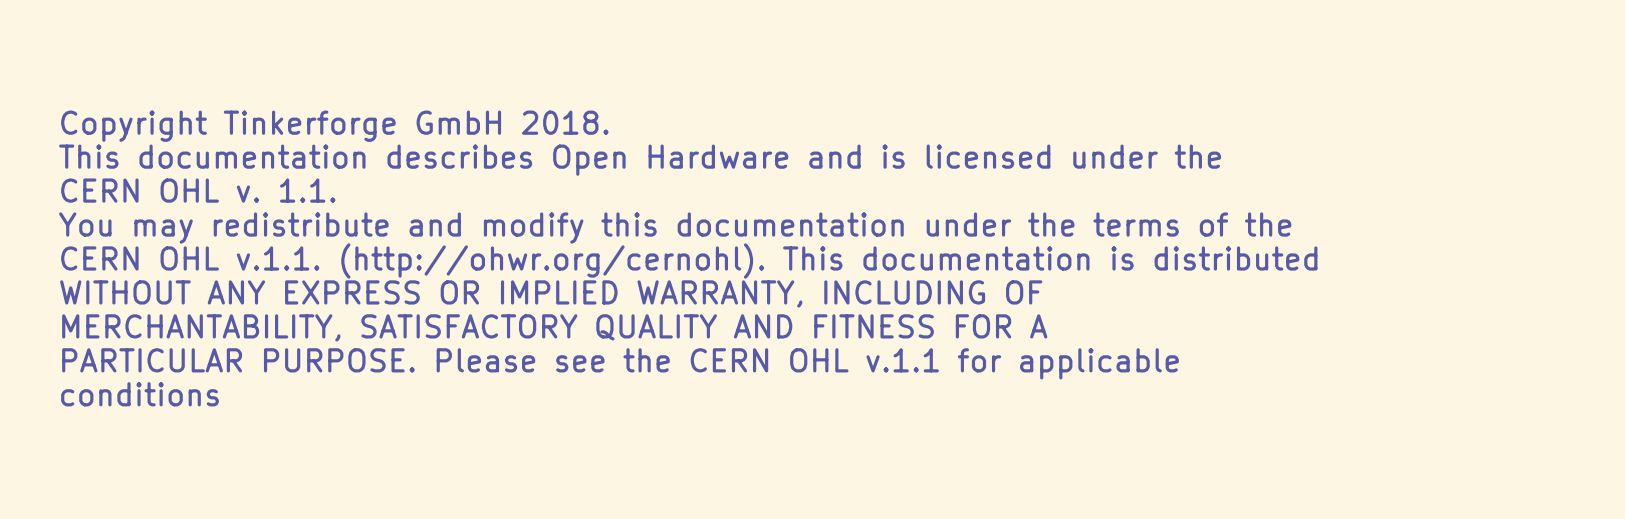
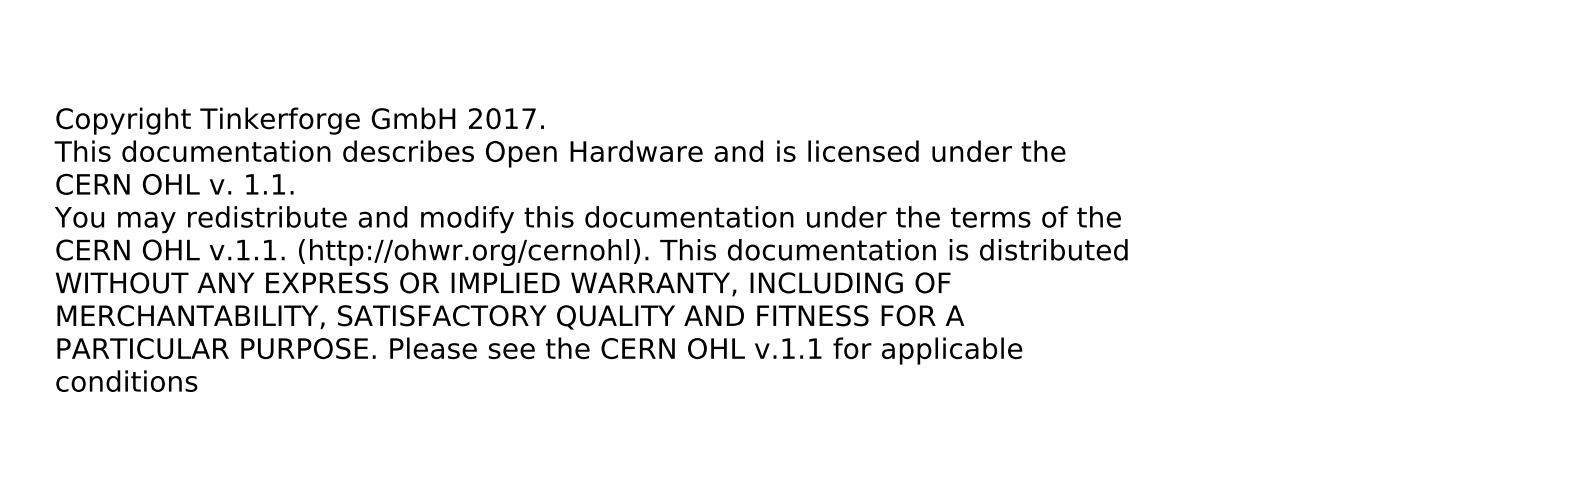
text: Copyright Tinkerforge GmbH 2018. (334, 126) -> Copyright Tinkerforge GmbH 2017. (300, 121)

